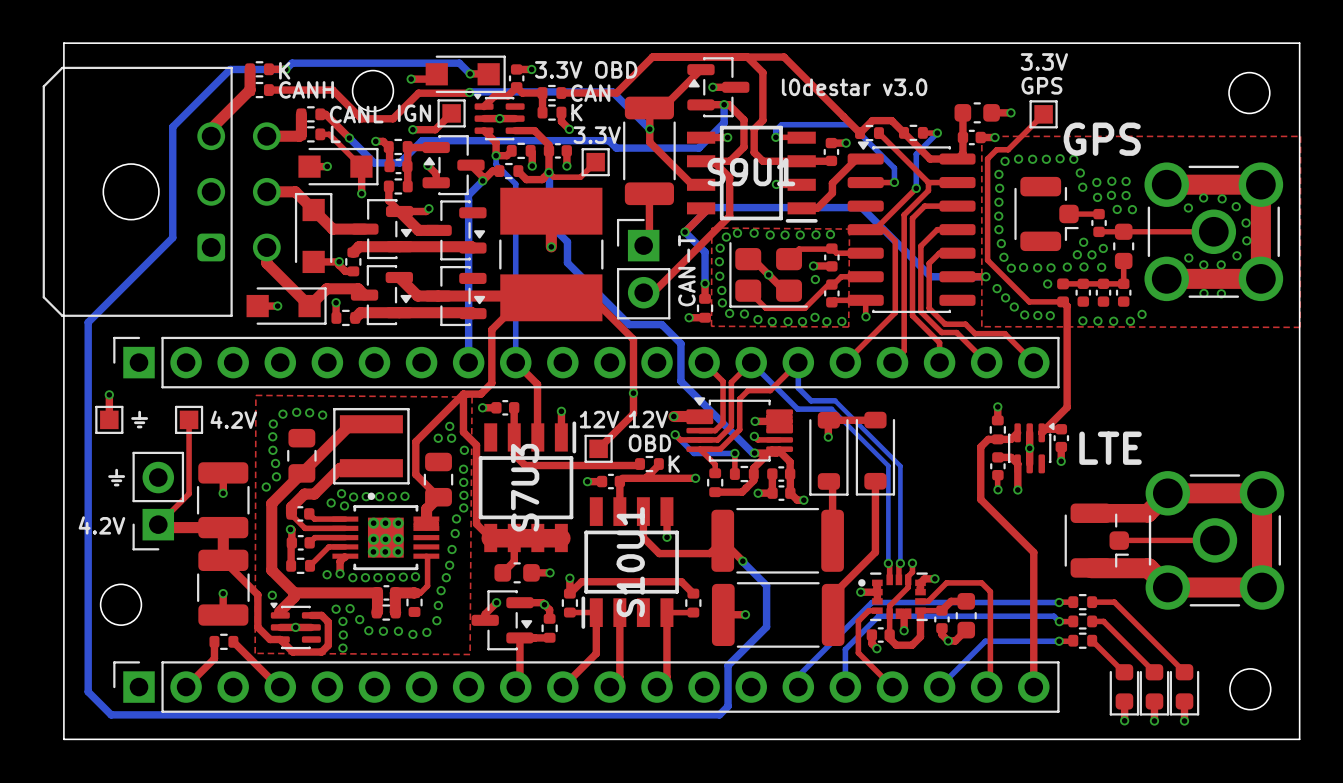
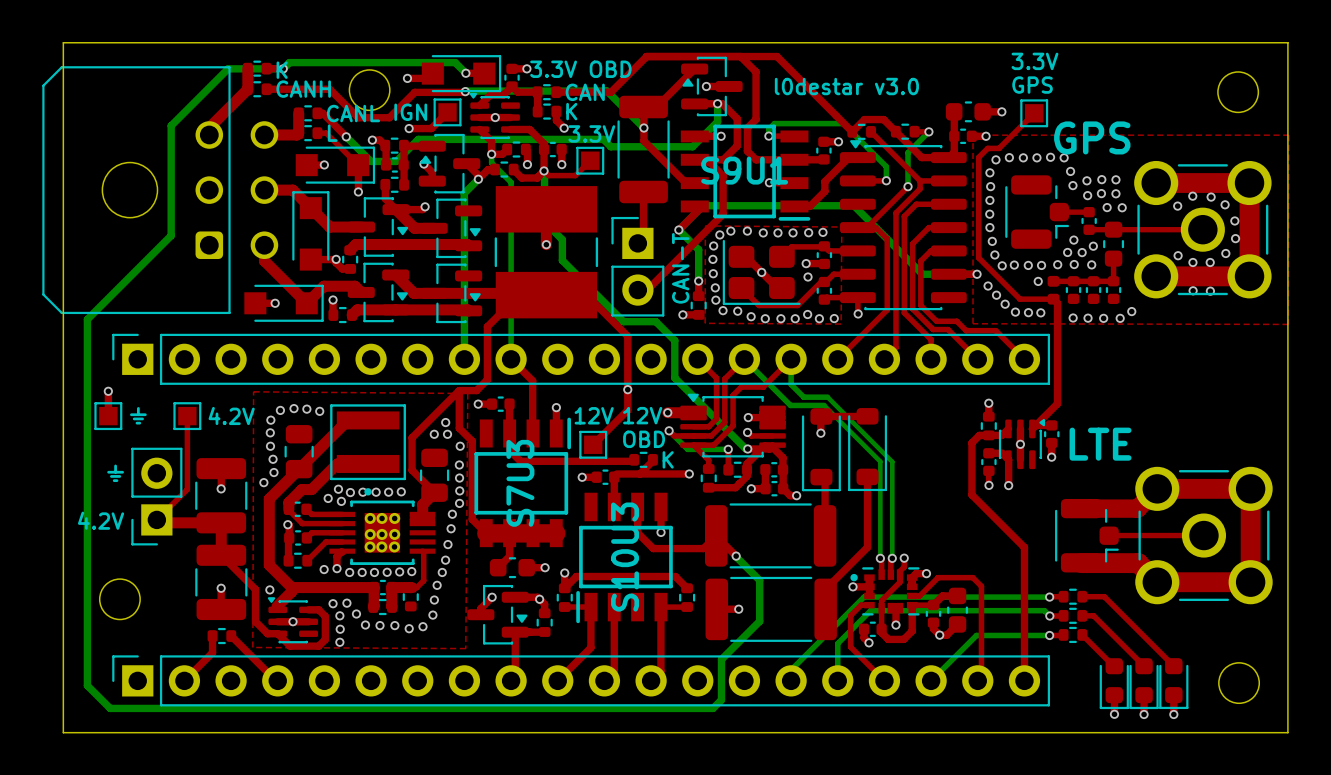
S10U1 name: S10U1 (630, 562) -> S10U3 (625, 557)

